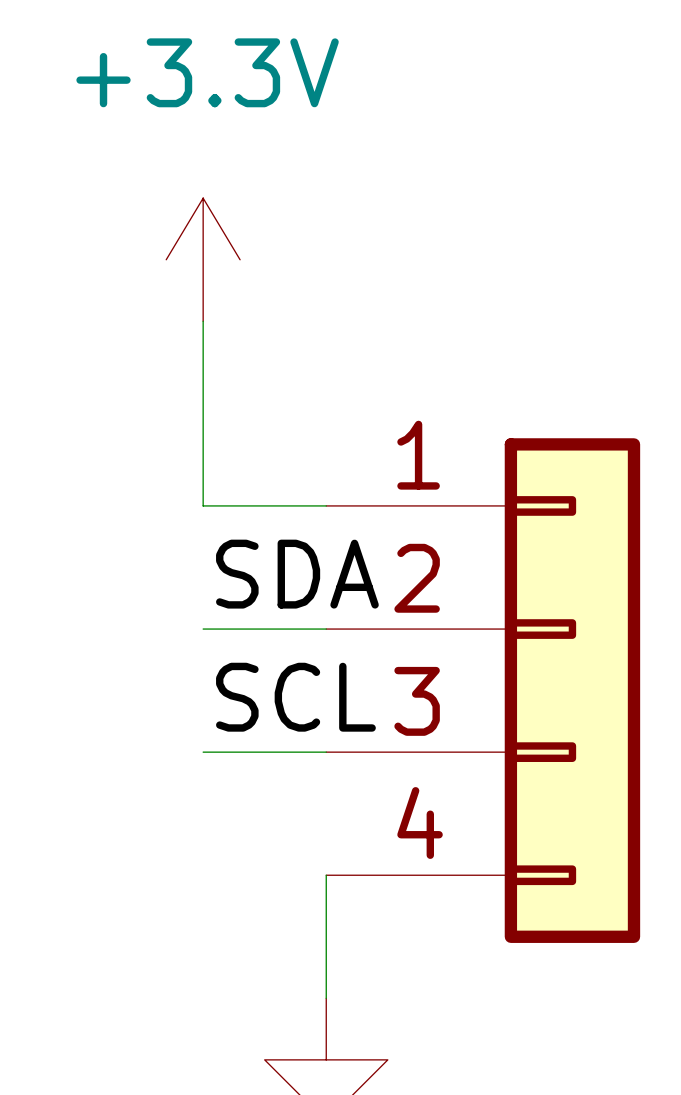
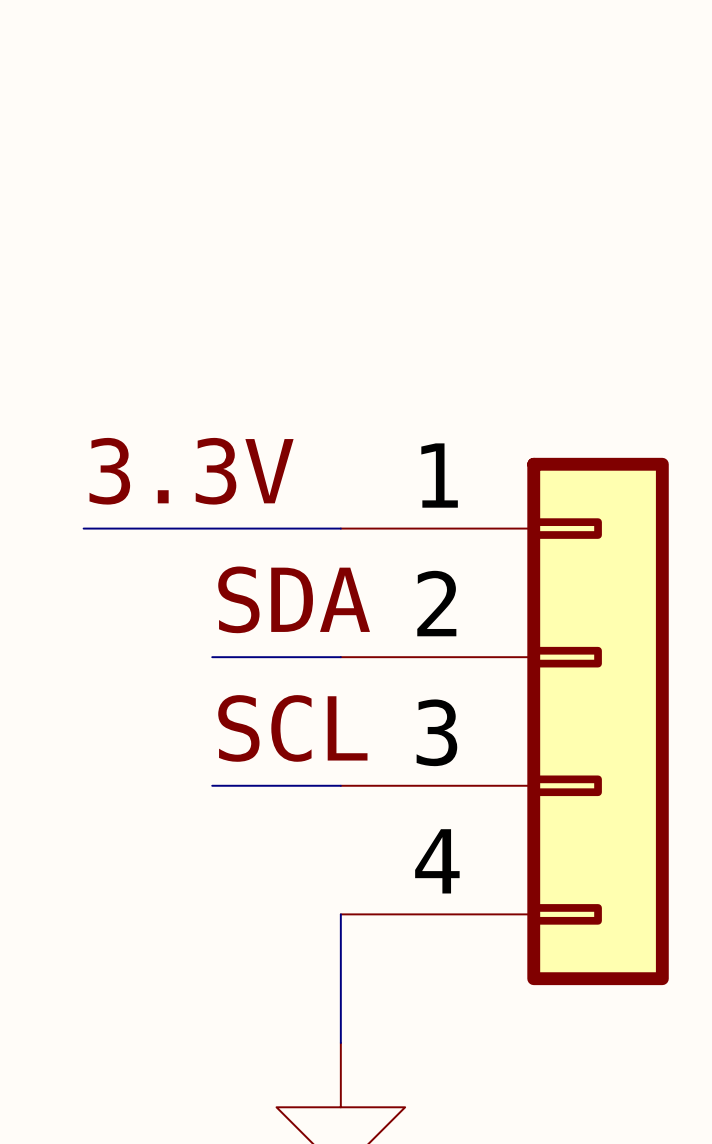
power symbol: +3.3V (203, 259) -> none
wire: (203, 321) (203, 505) -> (83, 528) (212, 528)
label: none -> 3.3V (191, 471)

